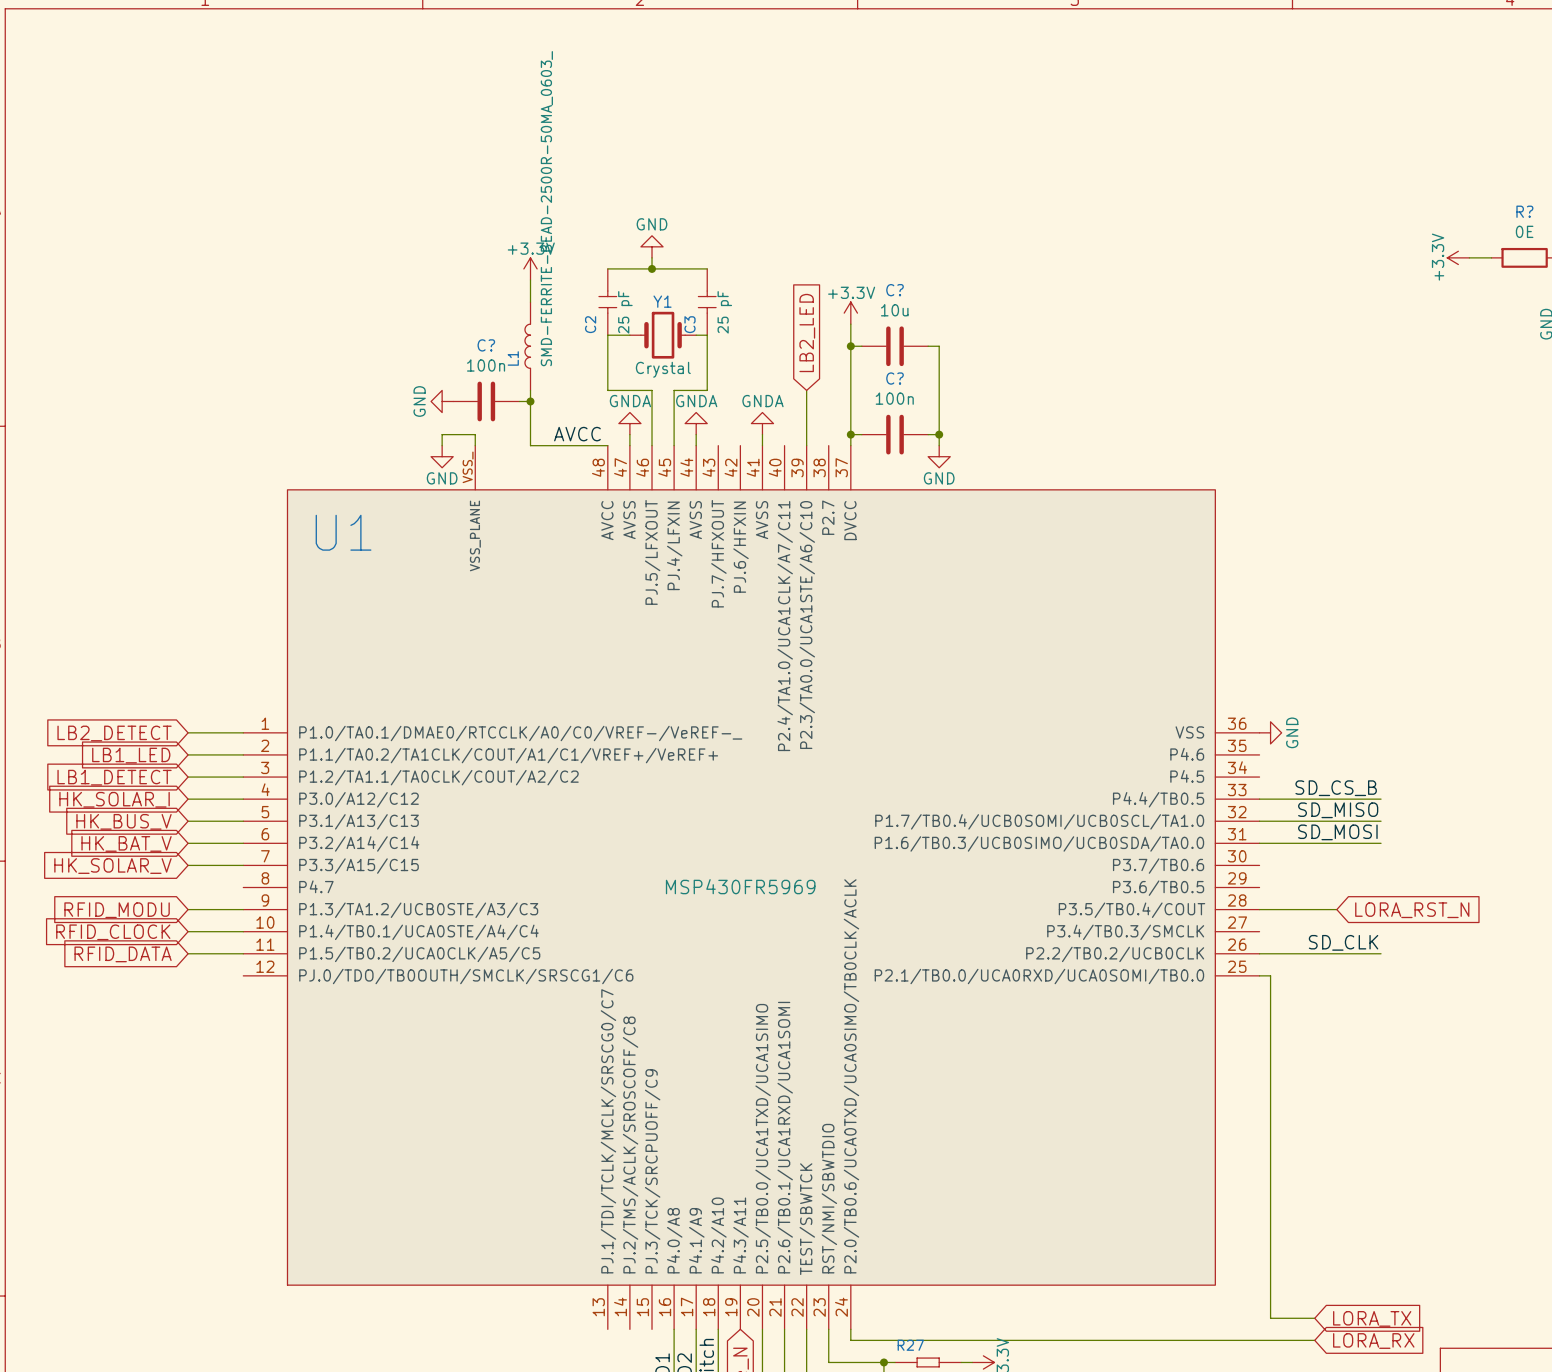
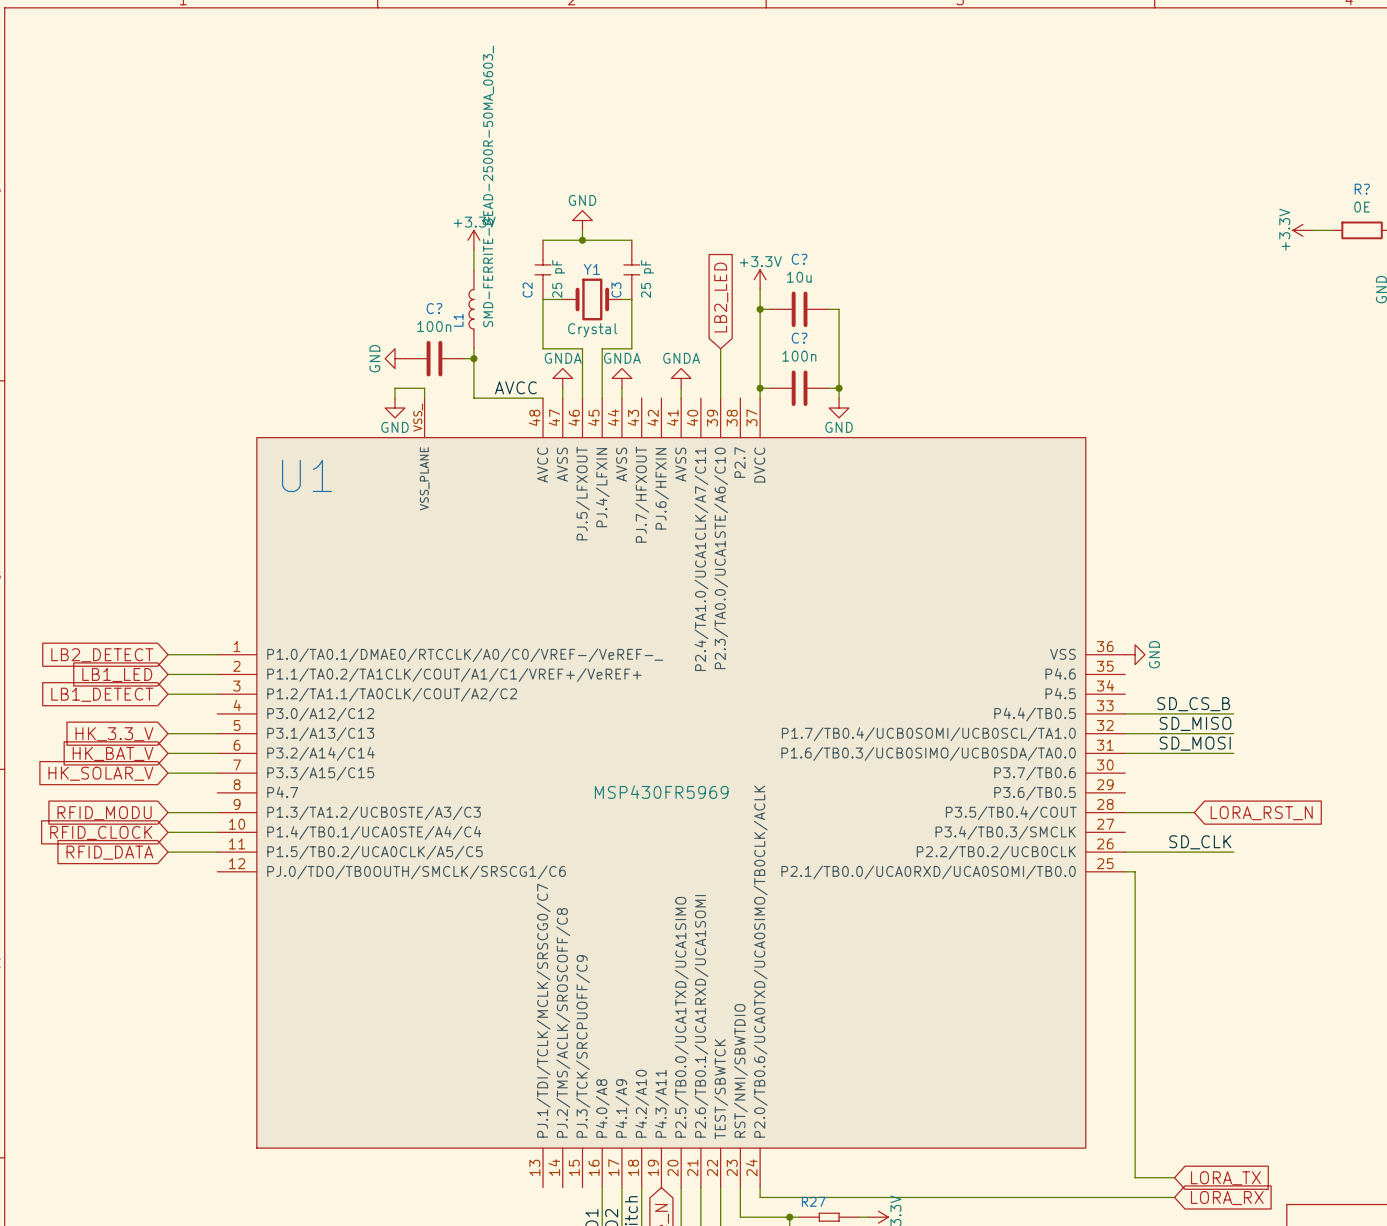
global label: HK_SOLAR_I (114, 799) -> none
wire: (188, 799) (243, 799) -> none
global label: HK_BUS_V (124, 821) -> HK_3.3_V (114, 734)

